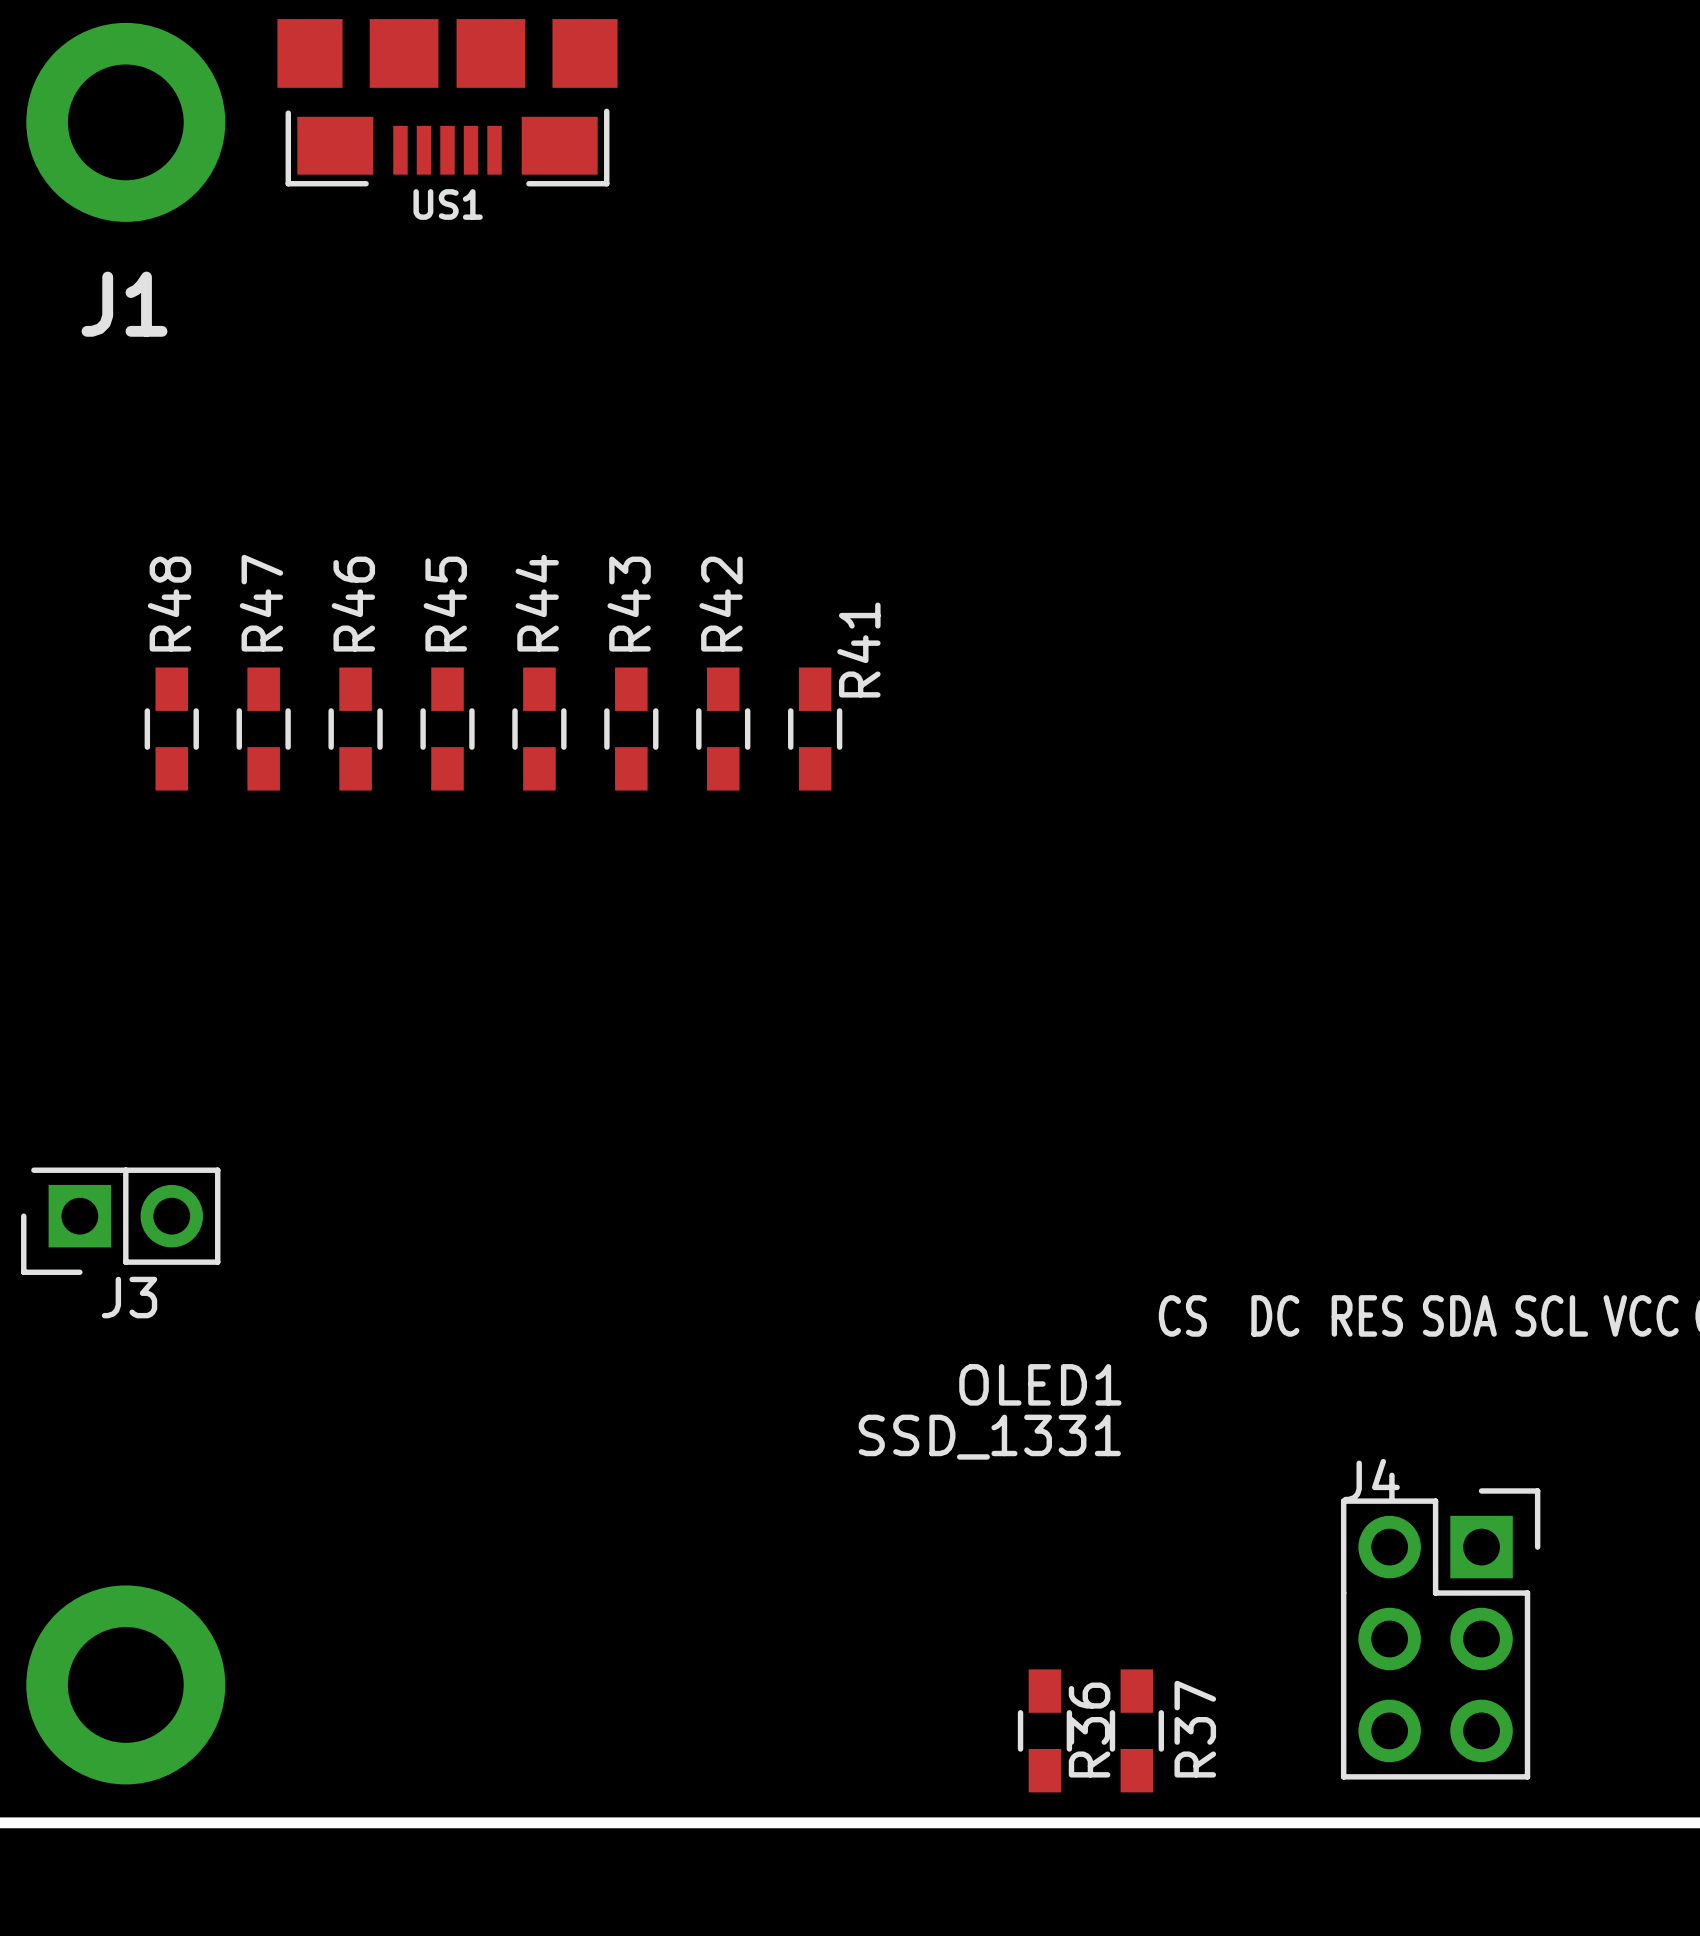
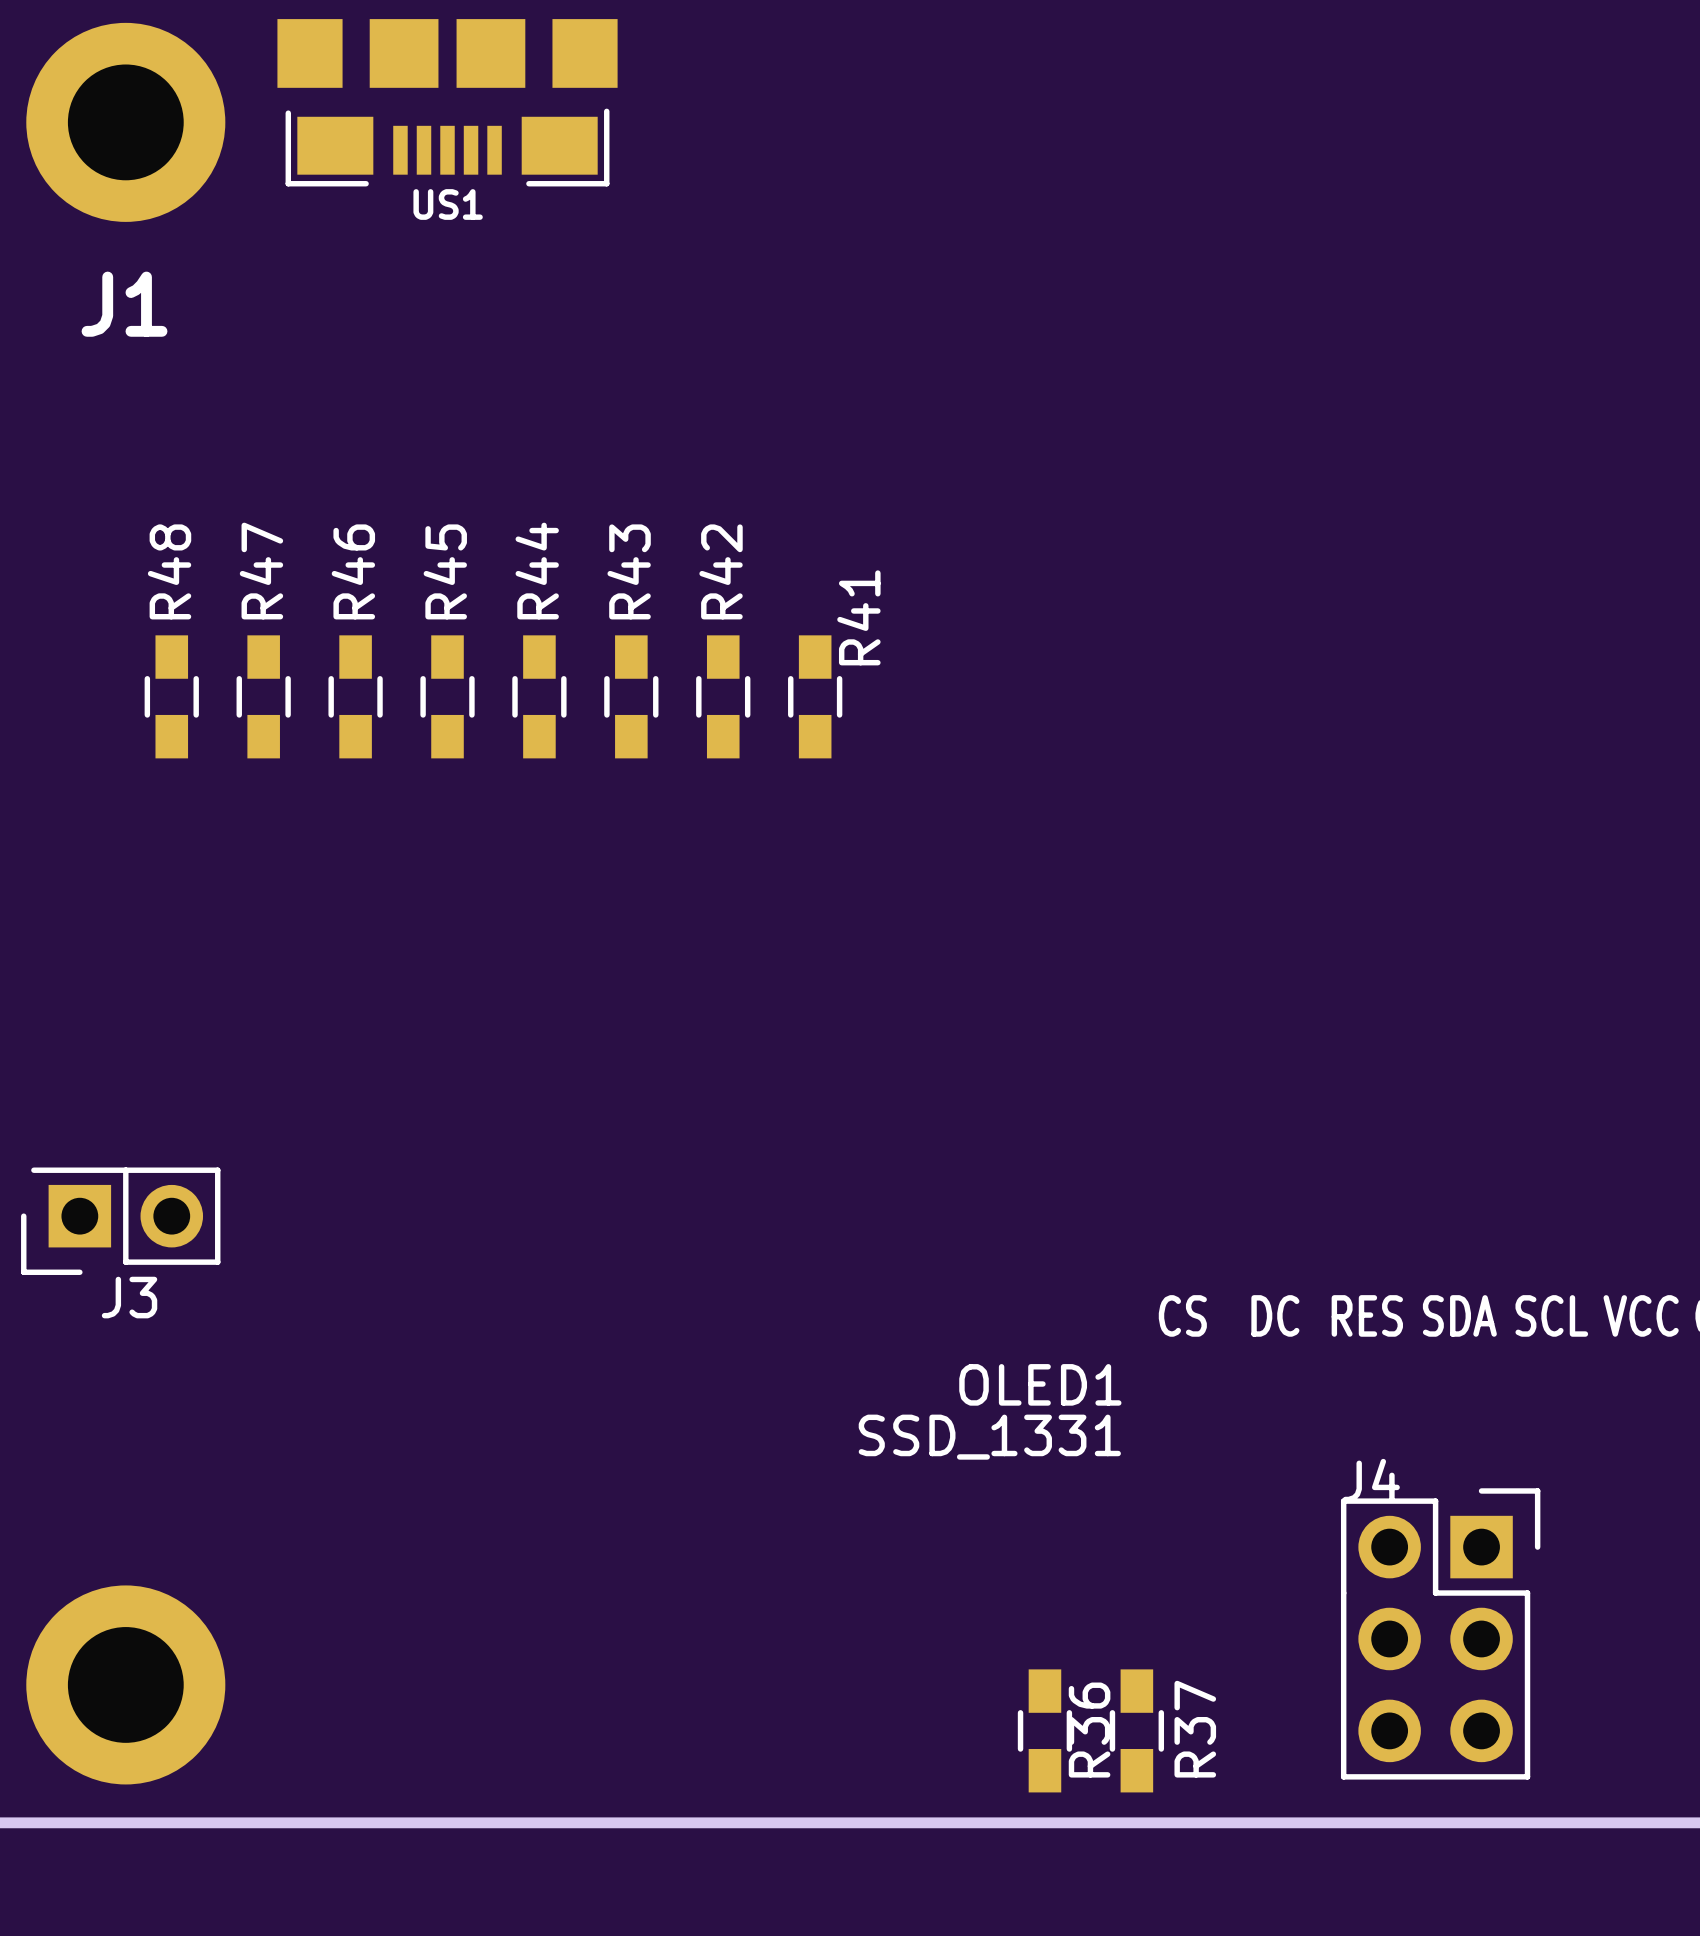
R48 position: (171, 729) -> (171, 696)
R47 position: (263, 729) -> (263, 696)
R46 position: (355, 729) -> (355, 696)
R45 position: (447, 729) -> (447, 696)
R44 position: (539, 729) -> (539, 696)
R43 position: (631, 729) -> (631, 696)
R42 position: (723, 729) -> (723, 696)
R41 position: (815, 729) -> (815, 696)

